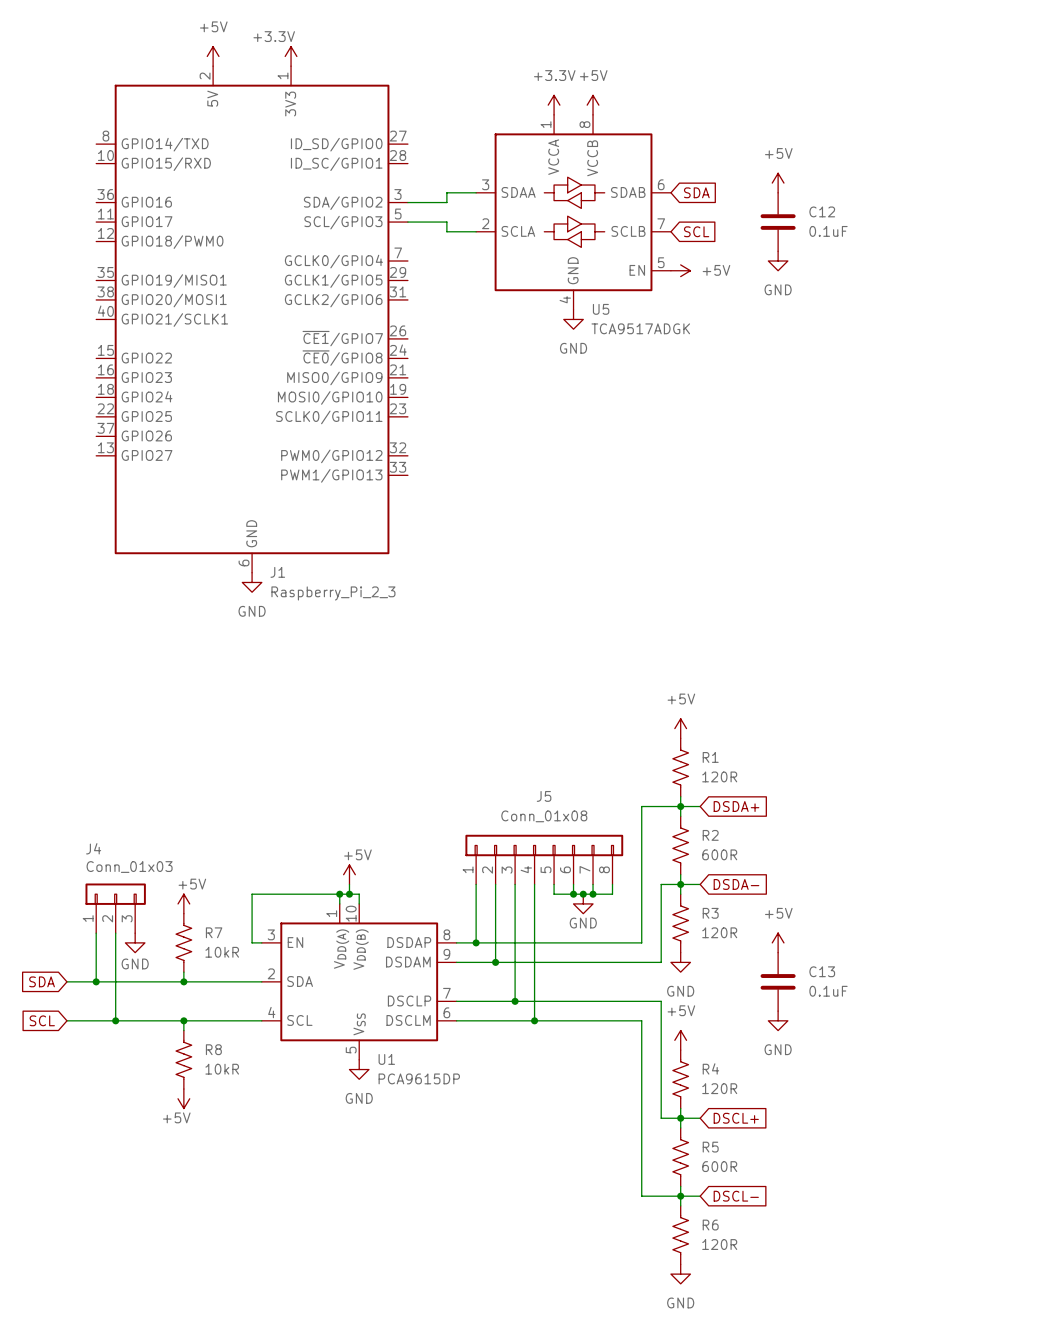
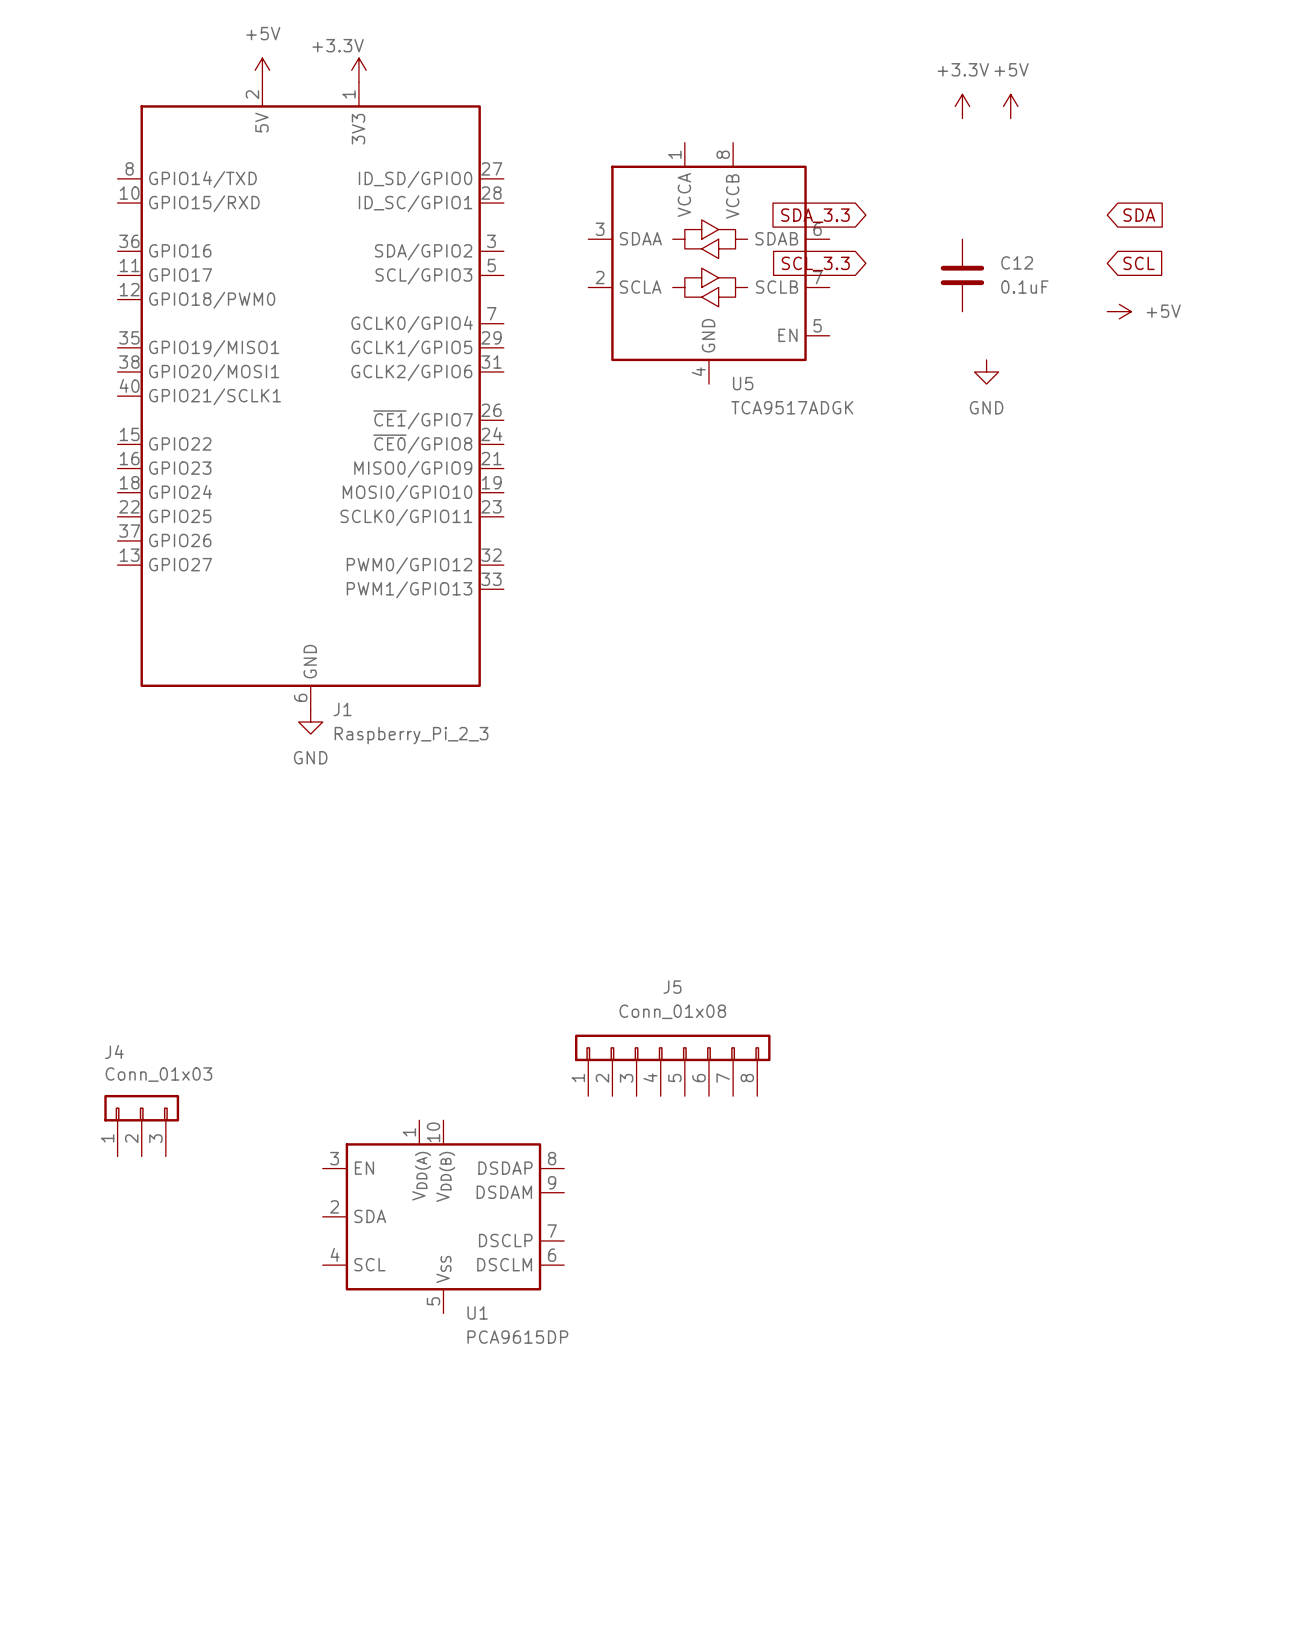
power symbol: none -> +3.3V (962, 106)
power symbol: none -> +5V (1010, 106)
power symbol: +3.3V (554, 105) -> none
power symbol: +5V (593, 105) -> none
global label: none -> SDA_3.3 (815, 215)
global label: none -> SDA (1139, 215)
power symbol: +5V (778, 183) -> none
wire: (476, 192) (446, 192) (446, 202) (407, 202) -> none
global label: SDA (696, 192) -> none
global label: none -> SCL_3.3 (815, 263)
global label: none -> SCL (1139, 263)
wire: (407, 222) (446, 222) (446, 231) (476, 231) -> none
global label: SCL (696, 231) -> none
power symbol: none -> +5V (1119, 311)
power symbol position: GND (778, 261) -> GND (986, 371)
power symbol: +5V (680, 270) -> none
power symbol: GND (573, 319) -> none
power symbol: +5V (680, 728) -> none
R1: 120R (680, 767) -> none
wire: (680, 796) (680, 816) -> none
junction: (680, 806) -> none
wire: (700, 806) (641, 806) (641, 942) (456, 942) -> none
global label: DSDA+ (736, 806) -> none
R2: 600R (680, 845) -> none
power symbol: +5V (349, 874) -> none
wire: (680, 874) (680, 894) -> none
wire: (349, 884) (349, 894) -> none
wire: (476, 884) (476, 942) -> none
wire: (495, 884) (495, 962) -> none
wire: (515, 884) (515, 1001) -> none
wire: (534, 884) (534, 1020) -> none
wire: (554, 884) (554, 894) (612, 894) (612, 884) -> none
wire: (573, 884) (573, 894) -> none
wire: (593, 884) (593, 894) -> none
junction: (680, 884) -> none
wire: (700, 884) (661, 884) (661, 962) (456, 962) -> none
global label: DSDA- (736, 884) -> none
wire: (339, 894) (339, 903) -> none
junction: (339, 894) -> none
junction: (349, 894) -> none
junction: (573, 894) -> none
junction: (583, 894) -> none
junction: (593, 894) -> none
power symbol: +5V (183, 903) -> none
wire: (359, 903) (359, 894) (252, 894) (252, 942) (261, 942) -> none
power symbol: GND (583, 903) -> none
R3: 120R (680, 923) -> none
wire: (96, 933) (96, 981) -> none
wire: (115, 933) (115, 1020) -> none
power symbol: GND (135, 942) -> none
R7: 10kR (183, 942) -> none
junction: (476, 942) -> none
power symbol: +5V (778, 942) -> none
junction: (495, 962) -> none
power symbol: GND (680, 962) -> none
wire: (183, 972) (183, 981) -> none
global label: SDA (42, 981) -> none
wire: (66, 981) (261, 981) -> none
junction: (96, 981) -> none
junction: (183, 981) -> none
C13: 0.1uF (778, 981) -> none
wire: (456, 1001) (661, 1001) (661, 1118) (700, 1118) -> none
junction: (515, 1001) -> none
global label: SCL (42, 1020) -> none
wire: (66, 1020) (261, 1020) -> none
junction: (115, 1020) -> none
wire: (183, 1020) (183, 1030) -> none
junction: (183, 1020) -> none
wire: (456, 1020) (641, 1020) (641, 1196) (700, 1196) -> none
junction: (534, 1020) -> none
power symbol: GND (778, 1020) -> none
power symbol: +5V (680, 1040) -> none
R8: 10kR (183, 1059) -> none
power symbol: GND (359, 1069) -> none
R4: 120R (680, 1079) -> none
power symbol: +5V (183, 1098) -> none
wire: (680, 1108) (680, 1127) -> none
junction: (680, 1118) -> none
global label: DSCL+ (736, 1118) -> none
R5: 600R (680, 1157) -> none
wire: (680, 1186) (680, 1205) -> none
junction: (680, 1196) -> none
global label: DSCL- (736, 1196) -> none
R6: 120R (680, 1235) -> none
power symbol: GND (680, 1274) -> none

